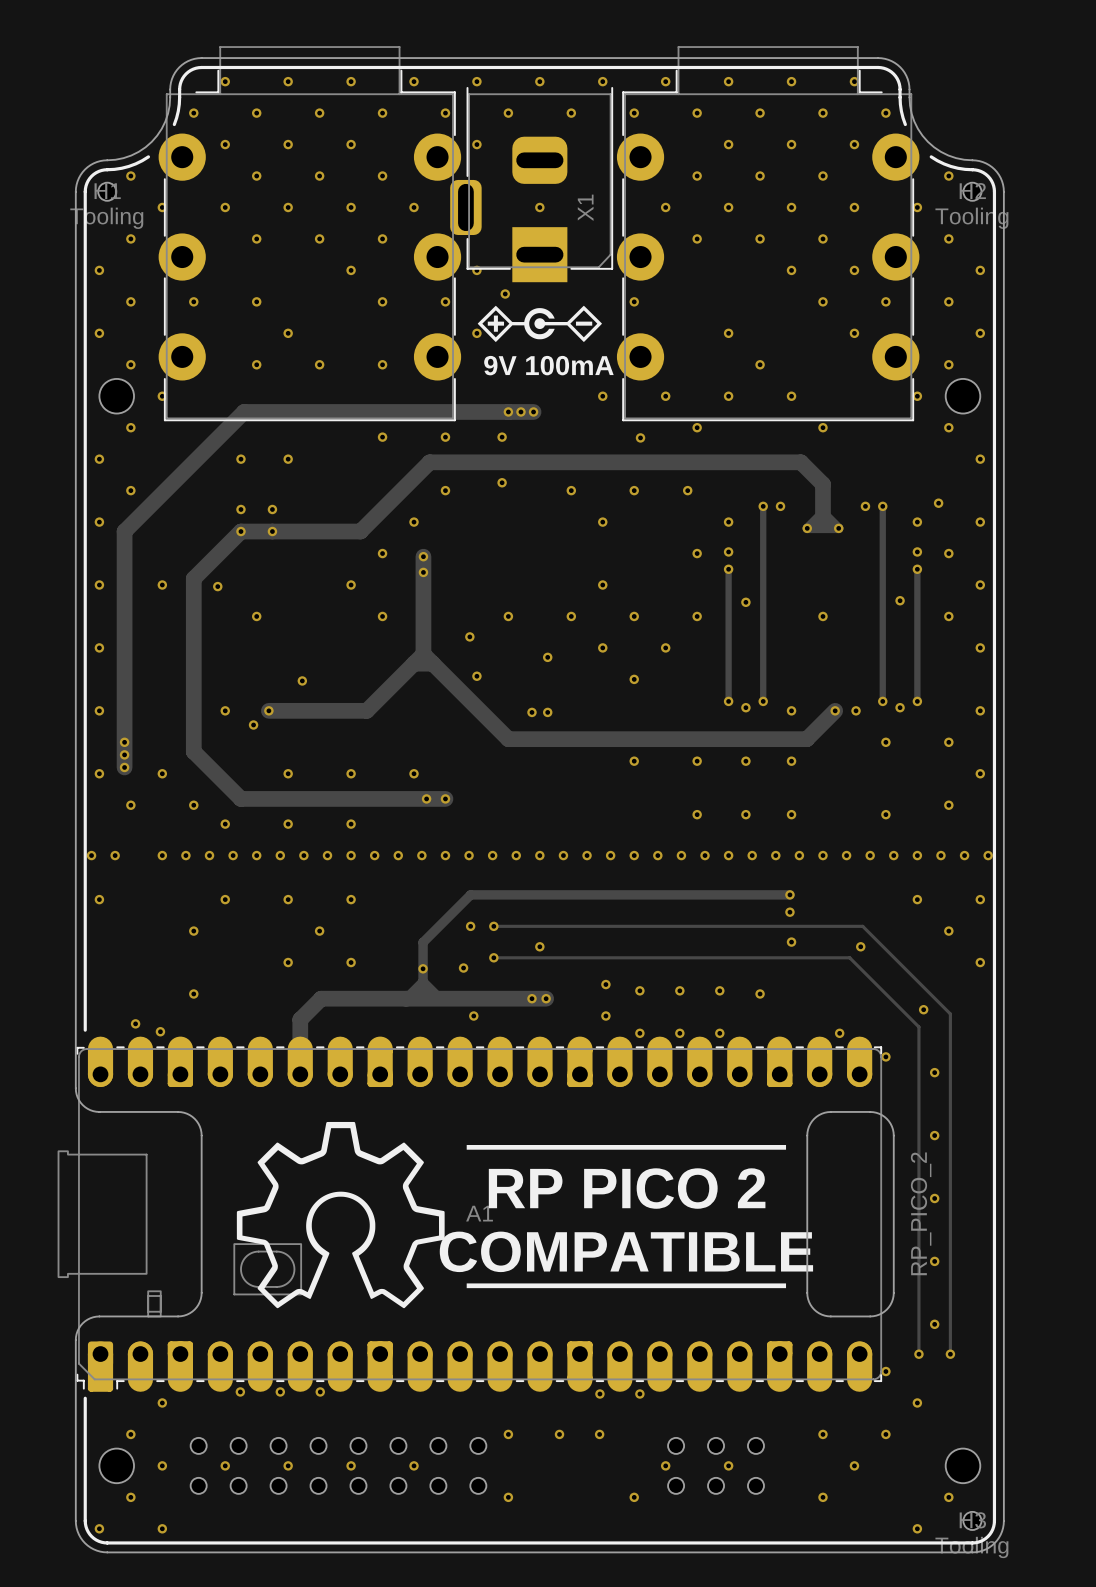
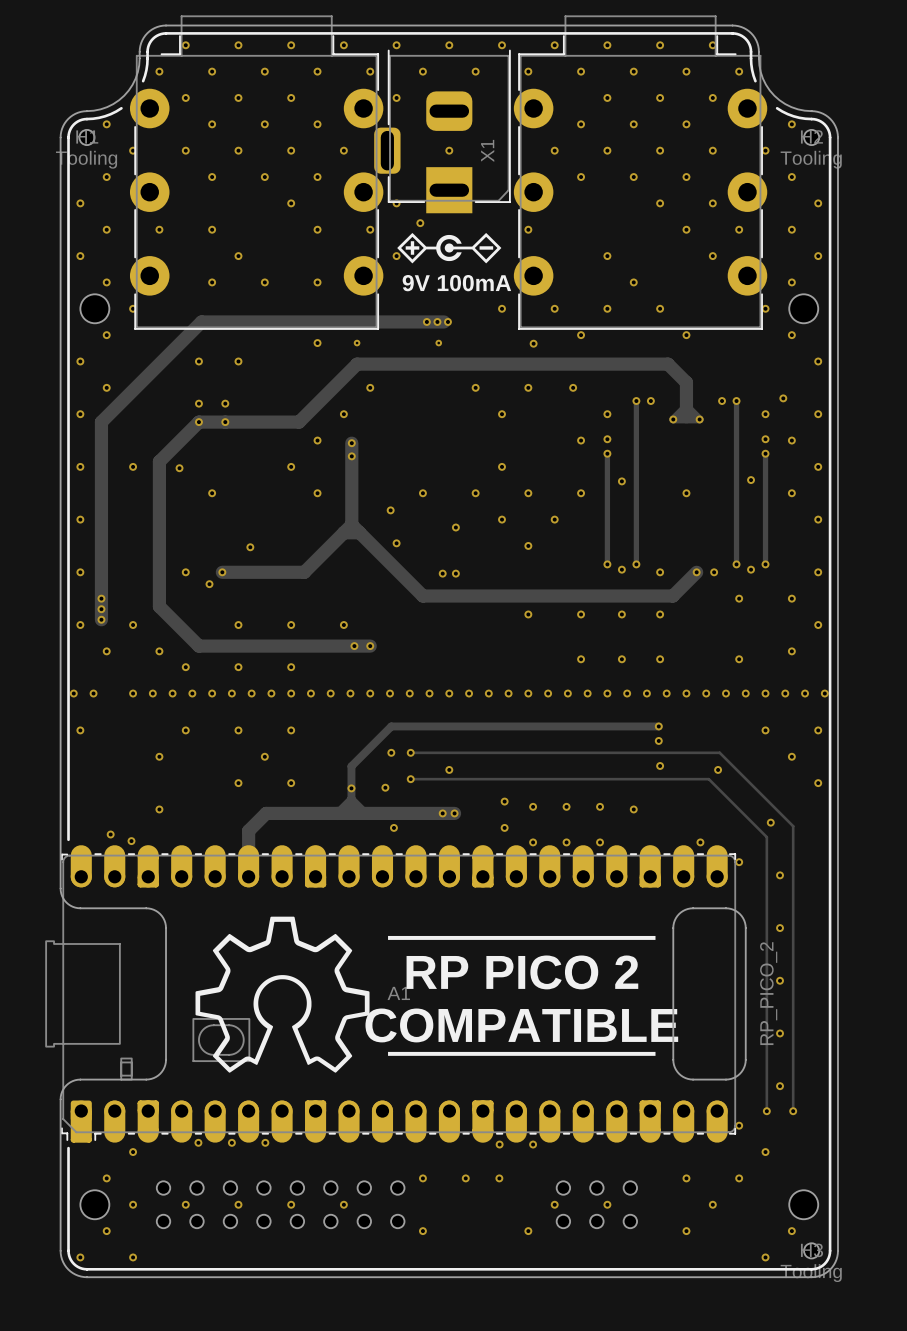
via: (508, 411) -> none
via: none -> (426, 321)
via: (520, 411) -> none
via: none -> (437, 321)
via: (533, 411) -> none
via: none -> (447, 321)
via: none -> (357, 343)
via: (445, 437) -> none
via: (502, 437) -> none
via: none -> (438, 343)
via: (502, 482) -> none

